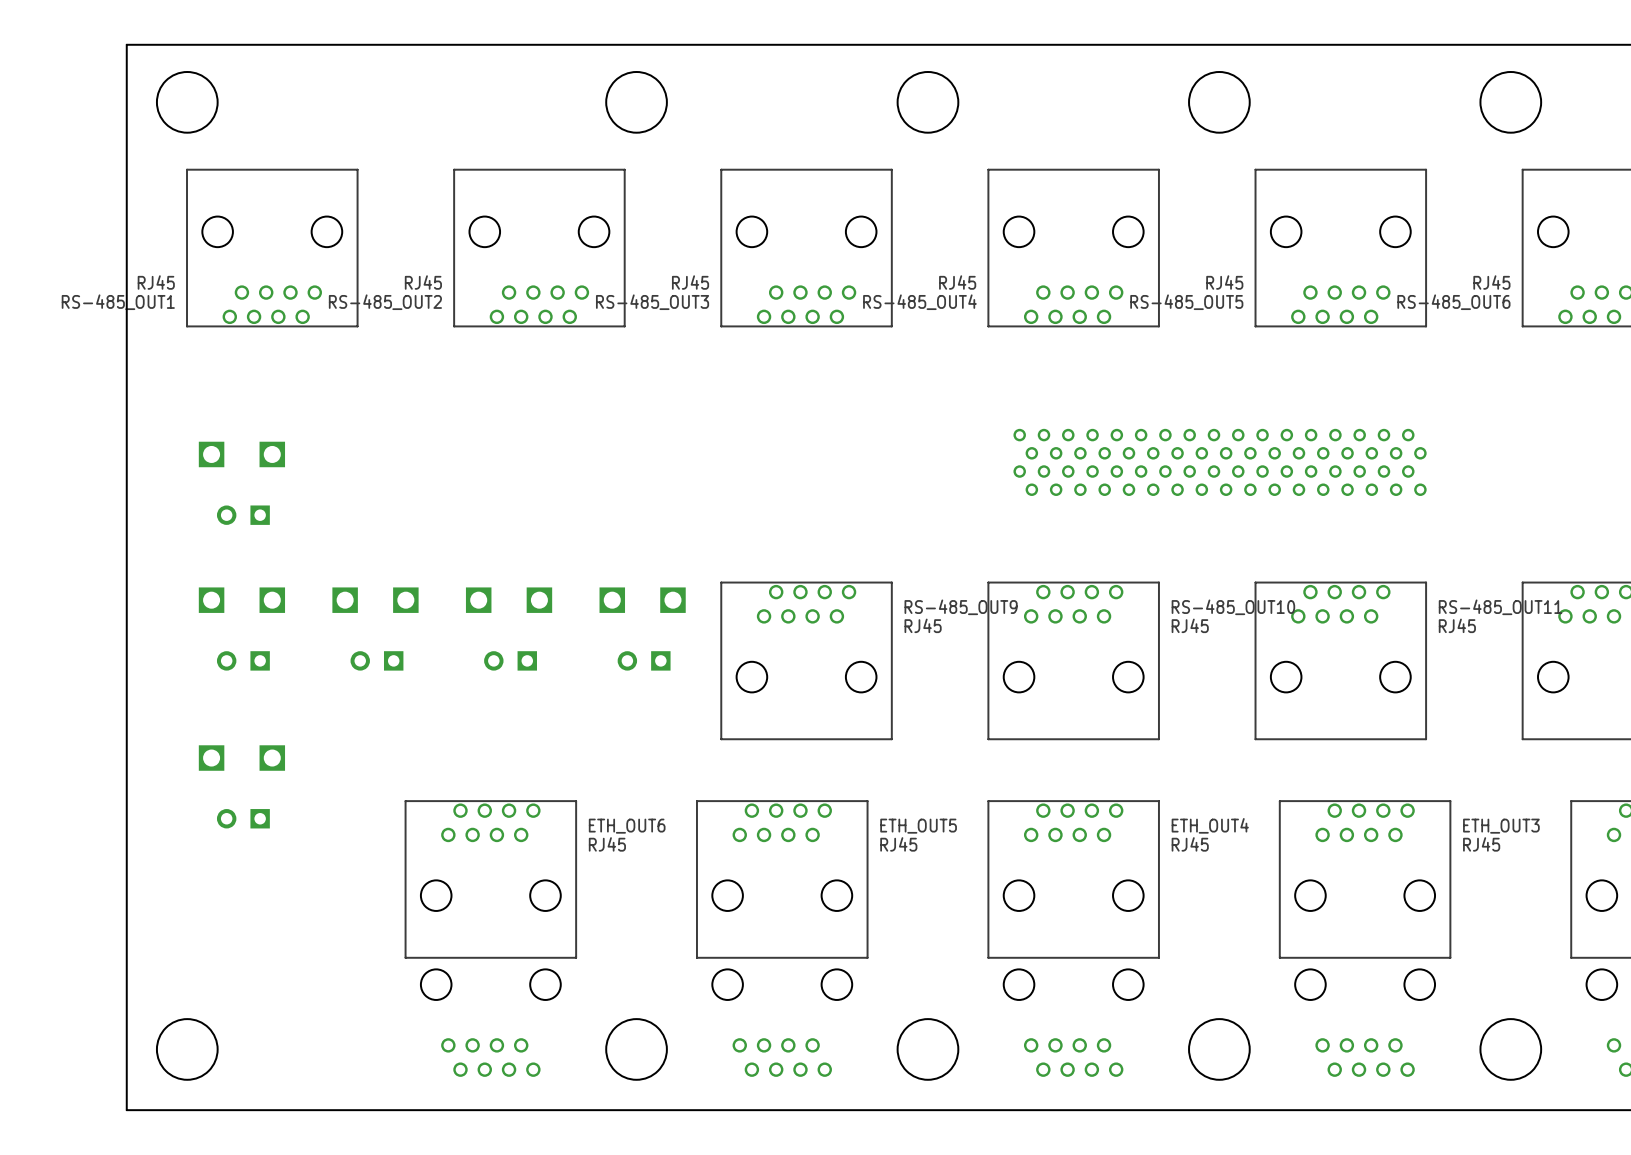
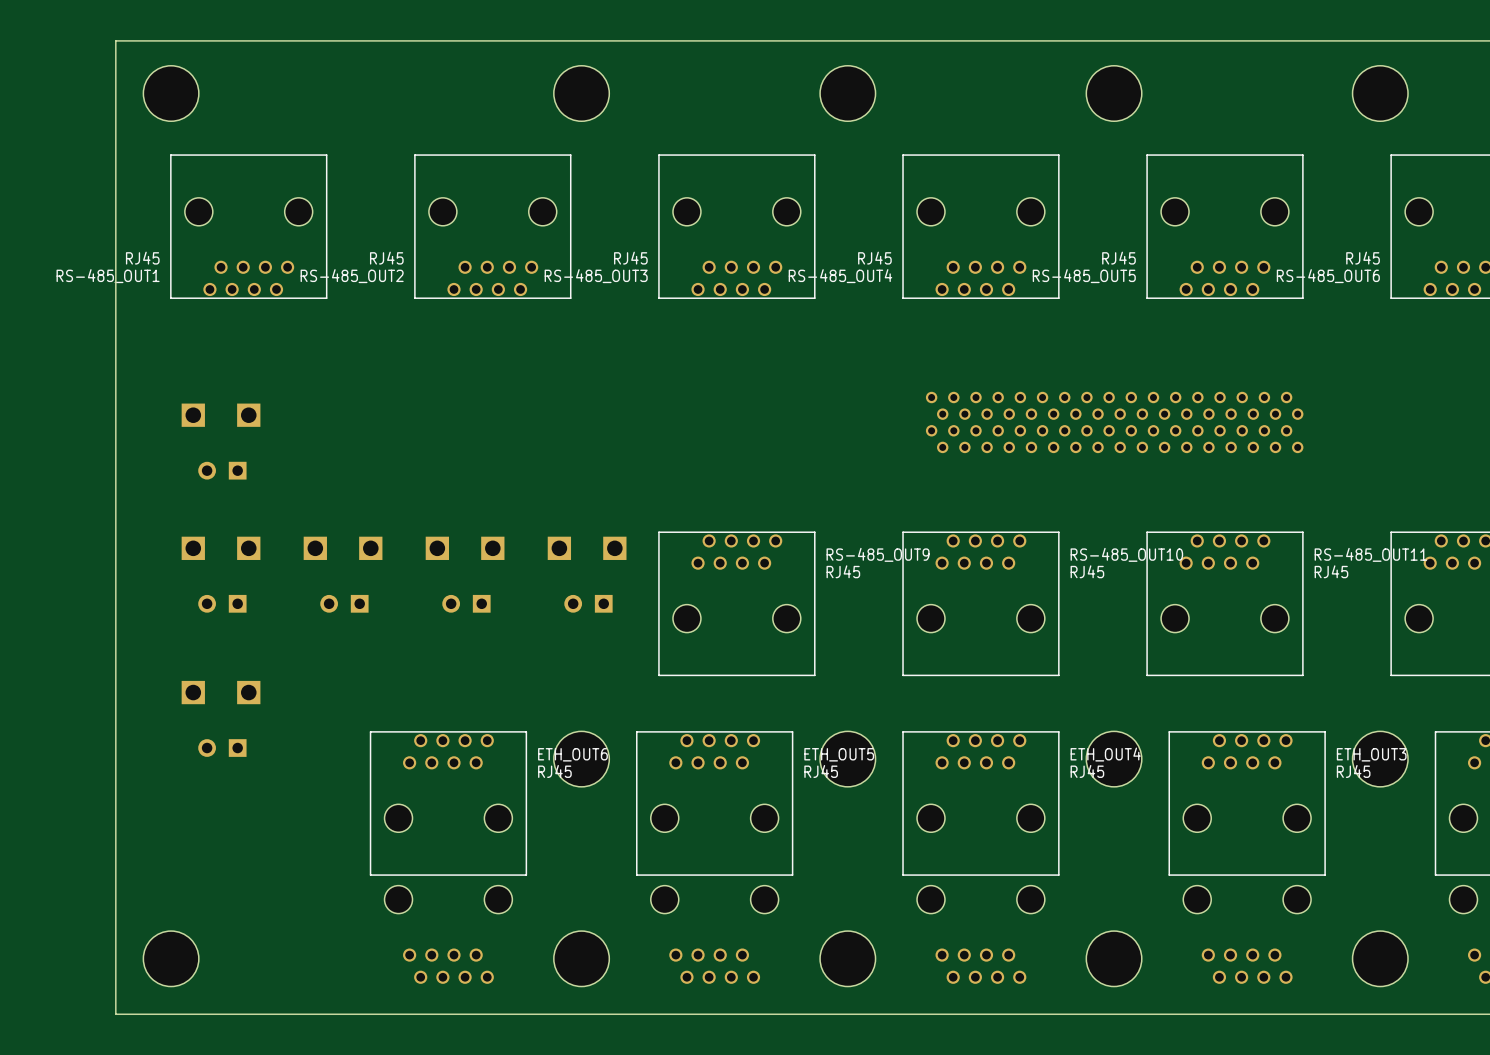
hole: none -> (581, 759)
hole: none -> (847, 759)
hole: none -> (1114, 759)
hole: none -> (1380, 759)

